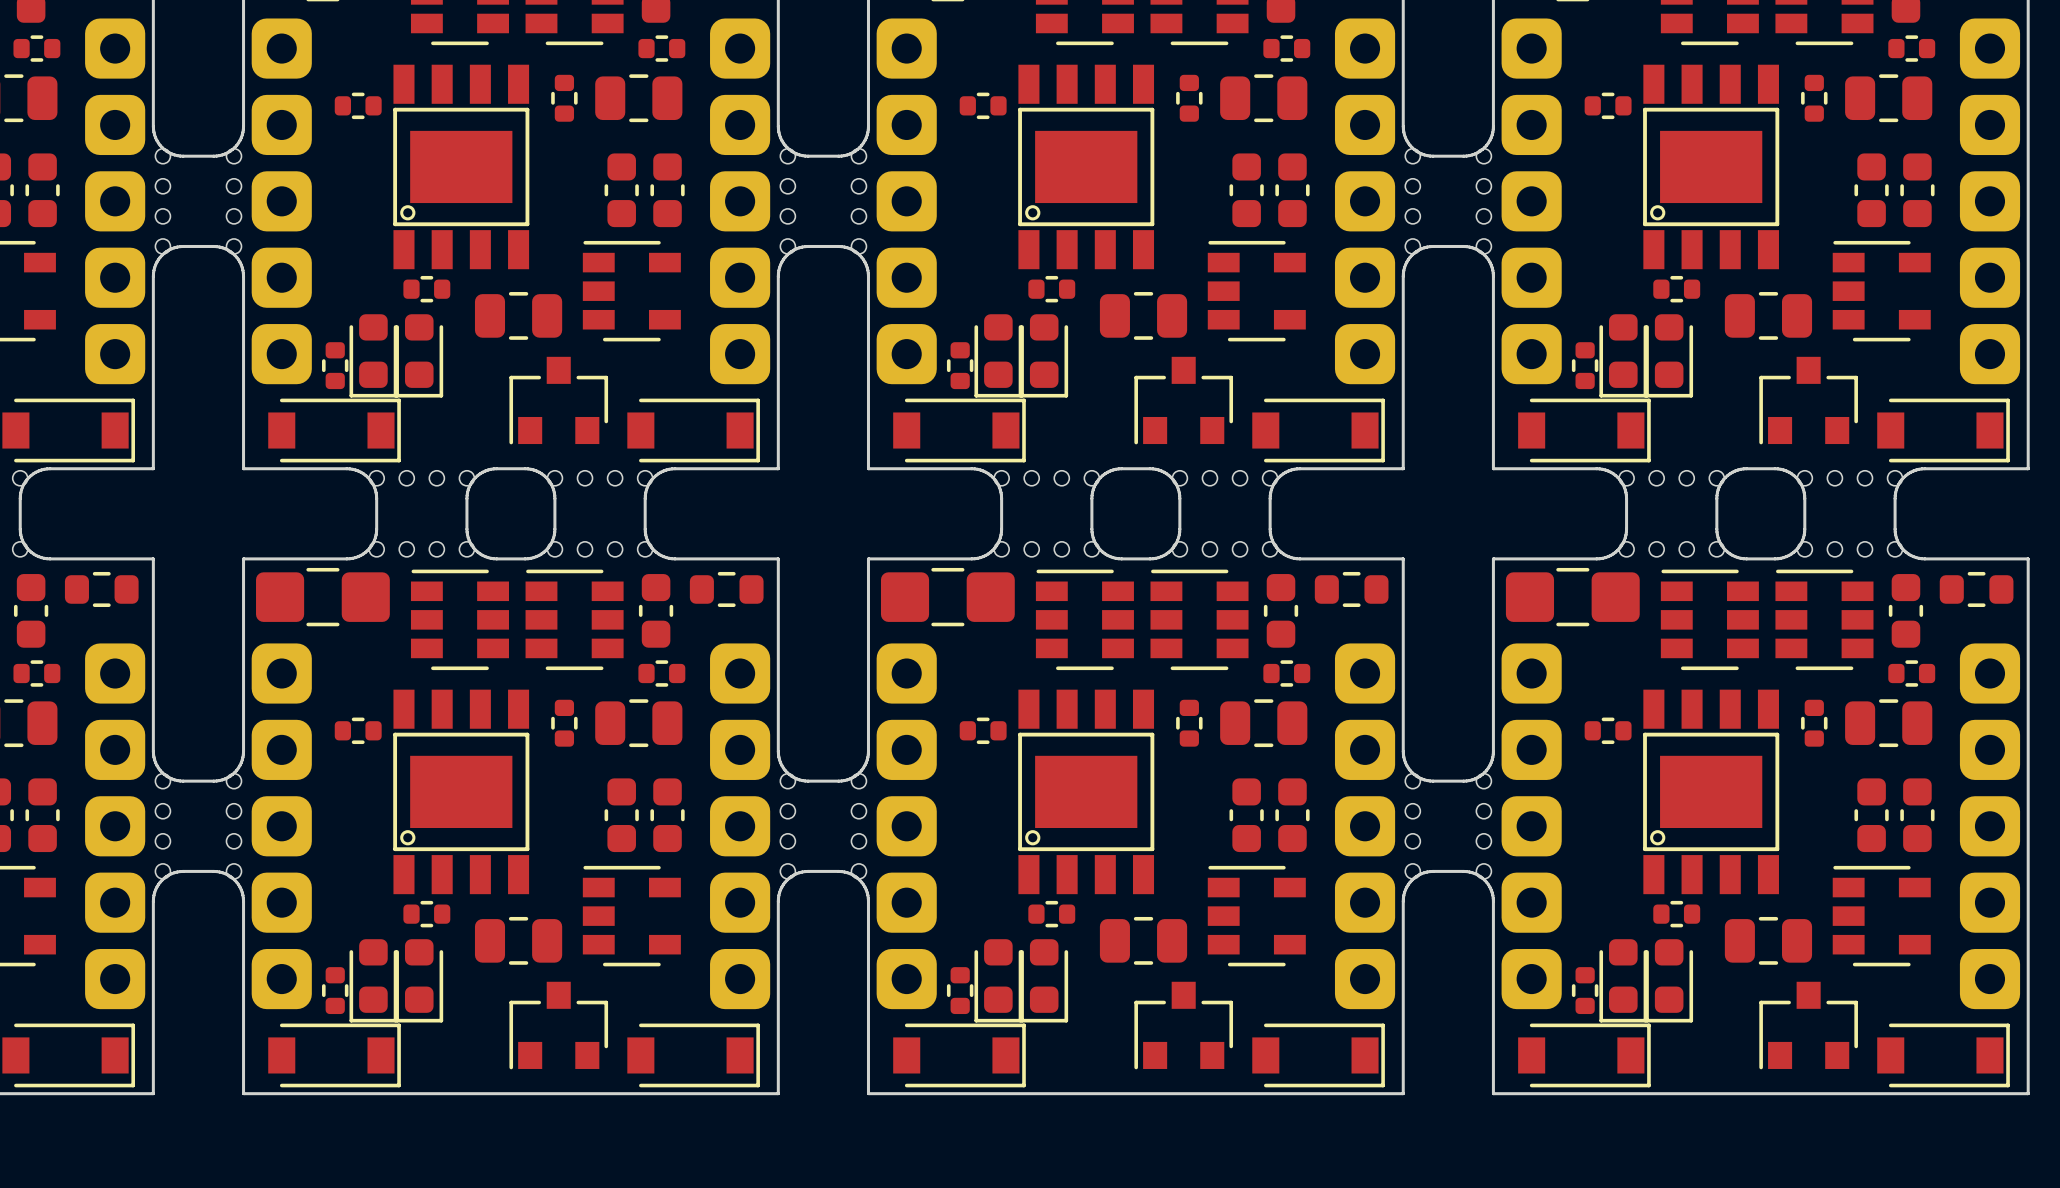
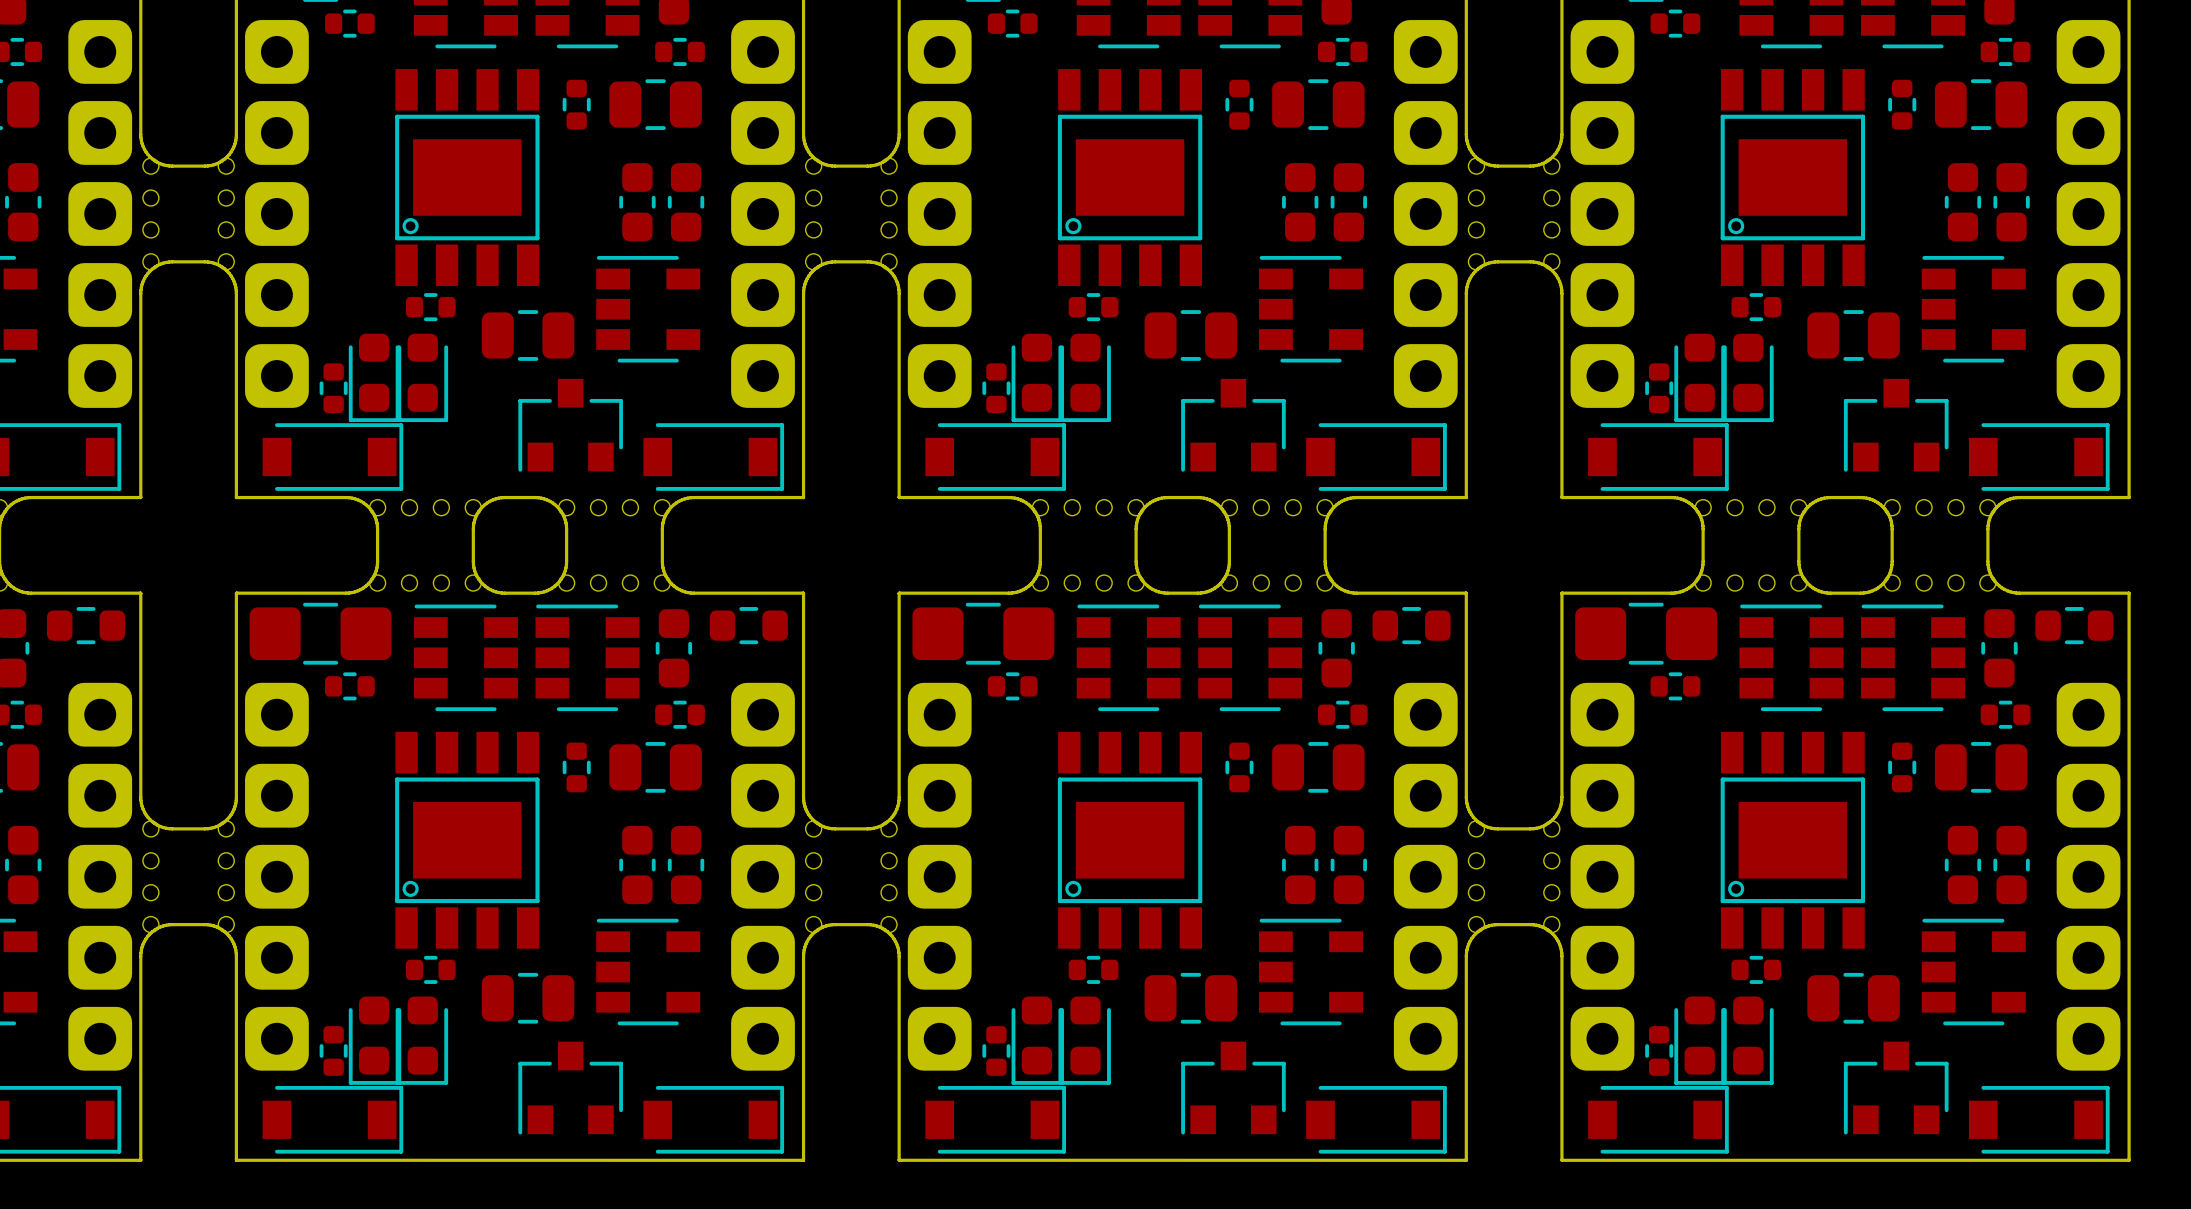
part position: (358, 105) -> (349, 23)
part position: (983, 105) -> (1012, 23)
part position: (1608, 105) -> (1675, 23)
part position: (358, 730) -> (349, 686)
part position: (983, 730) -> (1012, 686)
part position: (1608, 730) -> (1675, 686)

